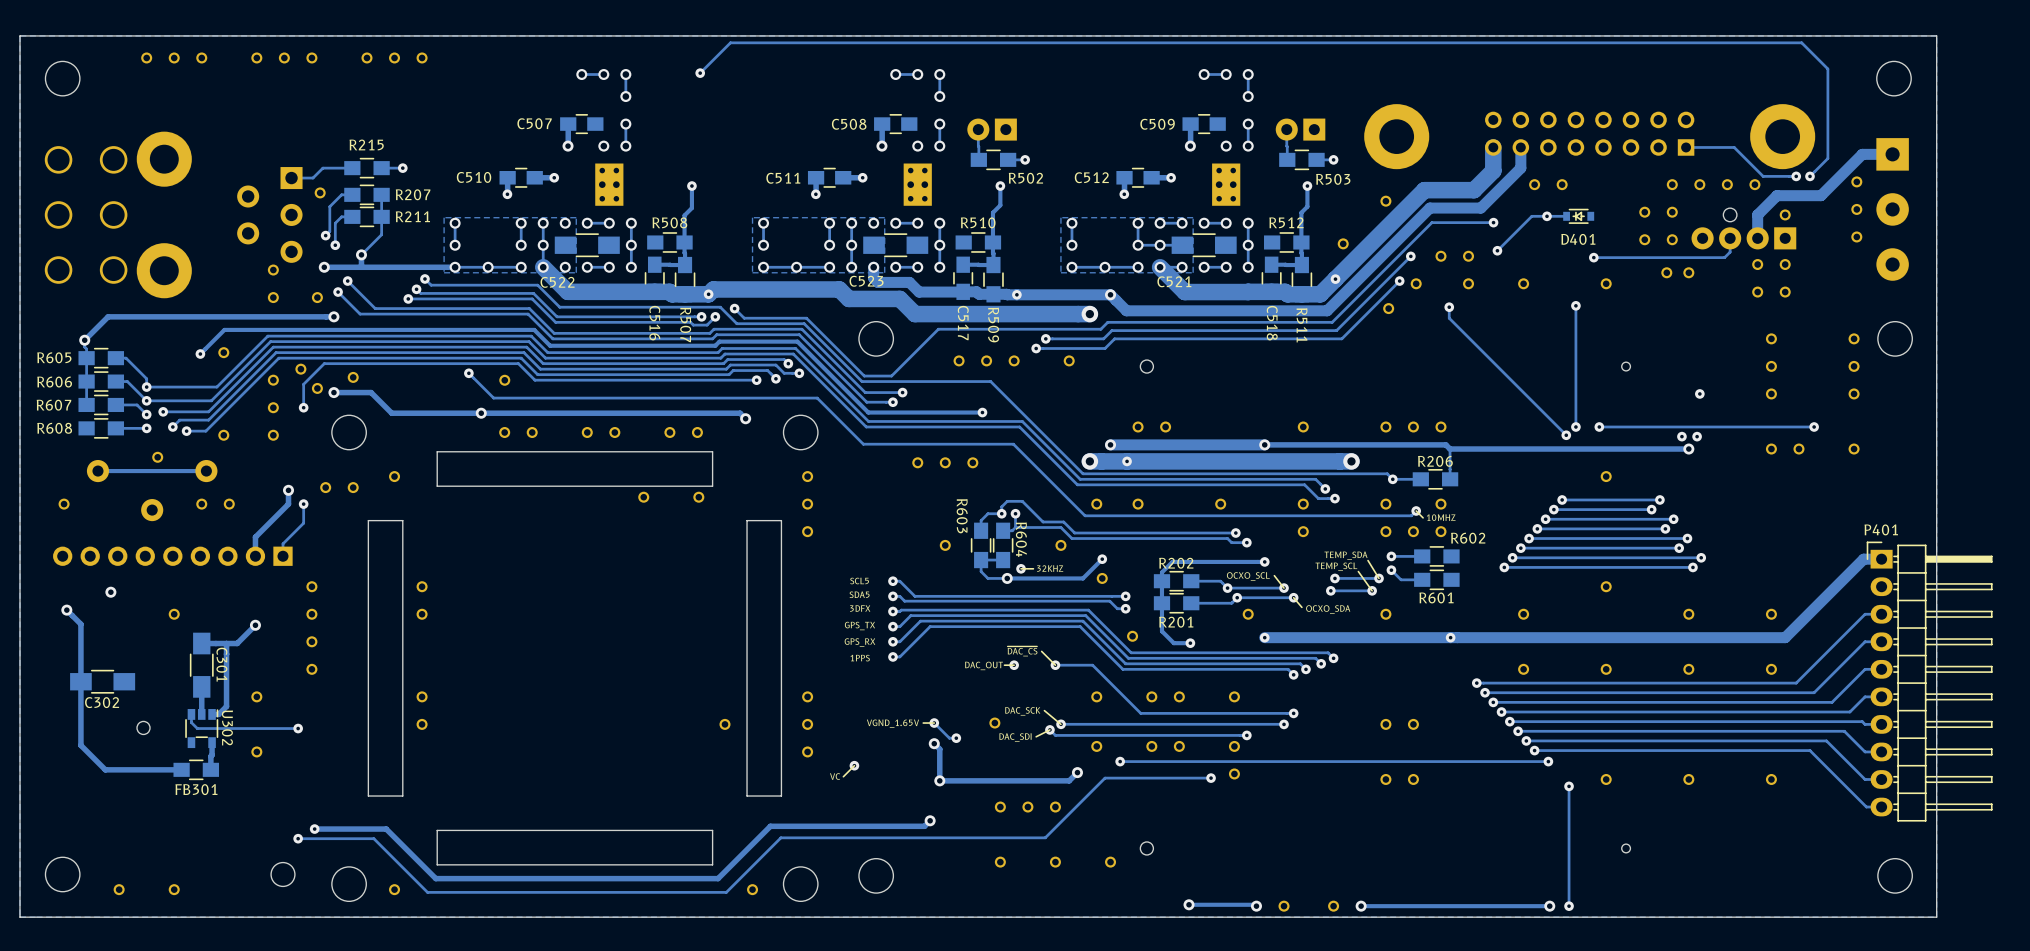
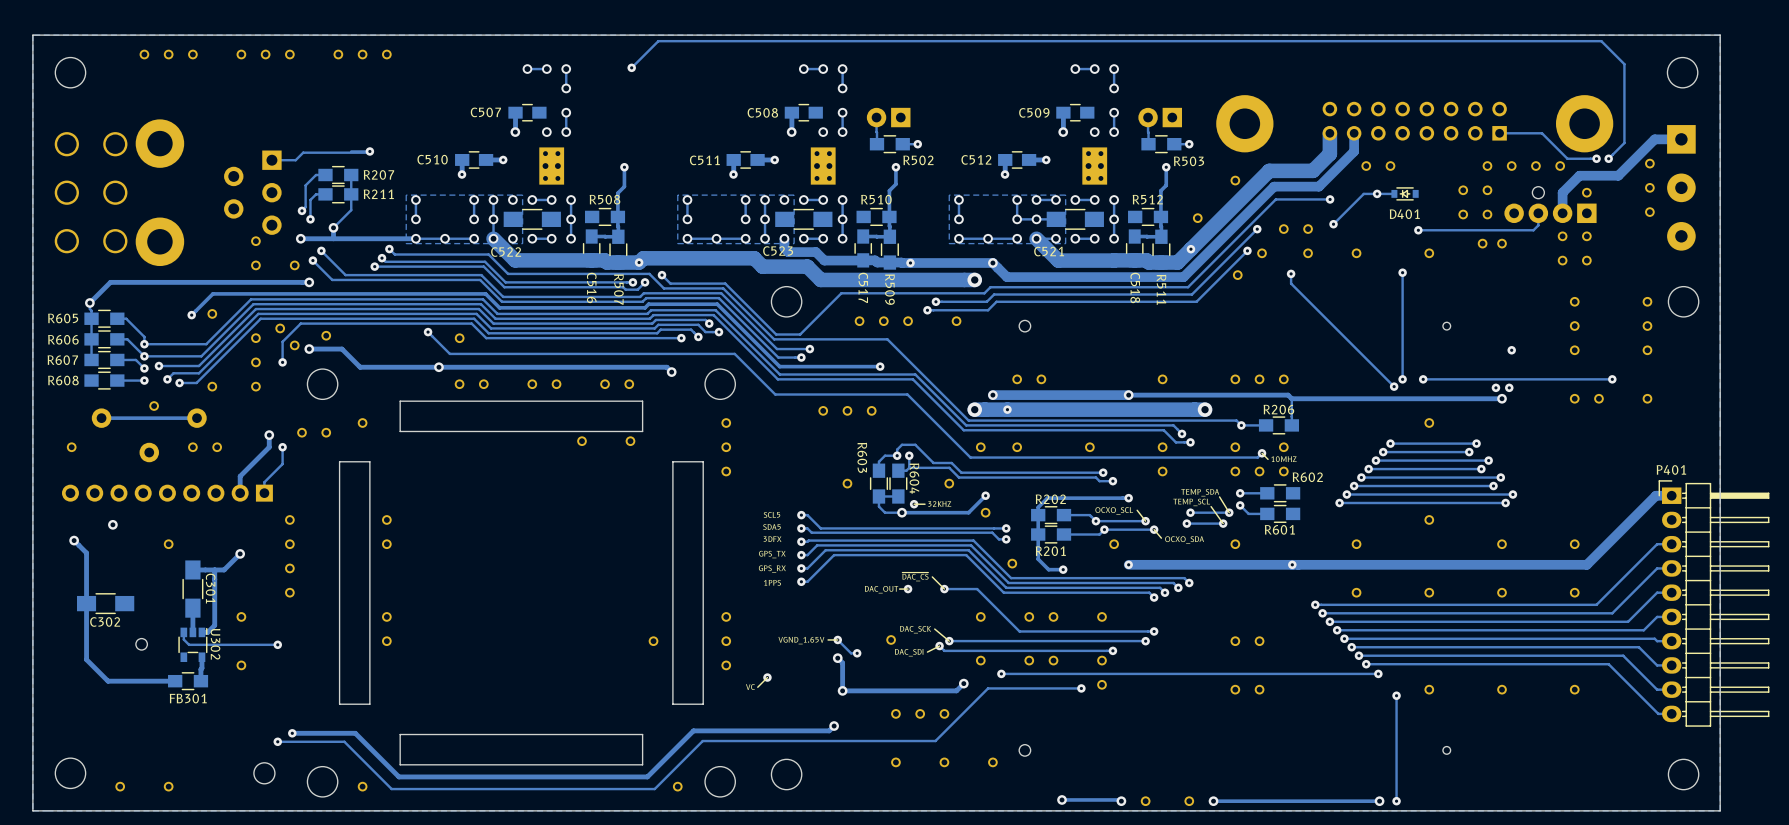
track: (352, 168) (322, 168) (313, 178) -> (368, 152) (303, 152) (295, 160) (290, 160)
R215: (366, 168) -> none
part: (320, 192) -> none

